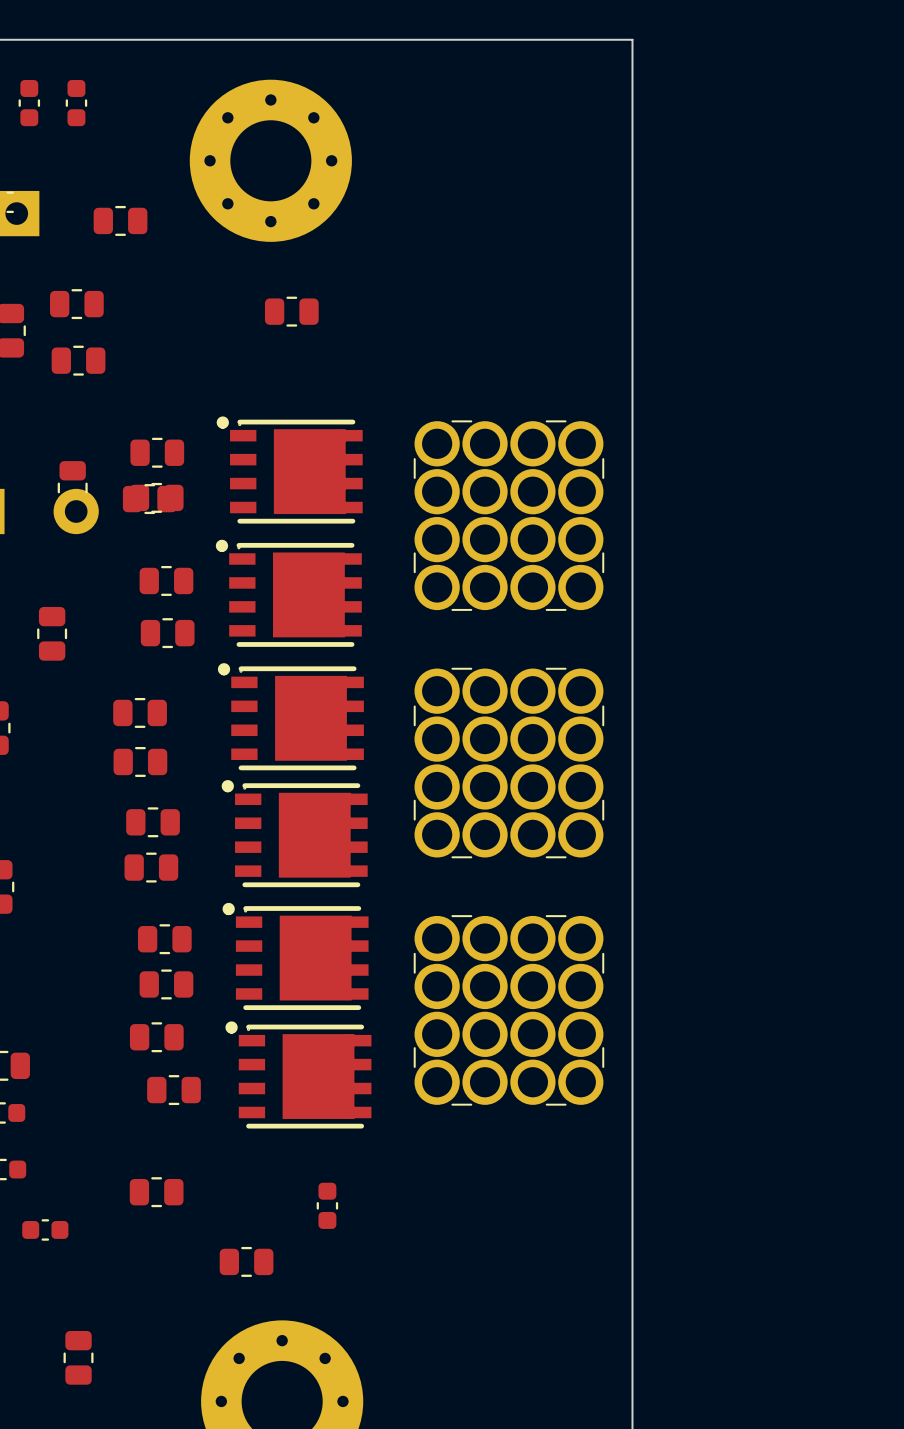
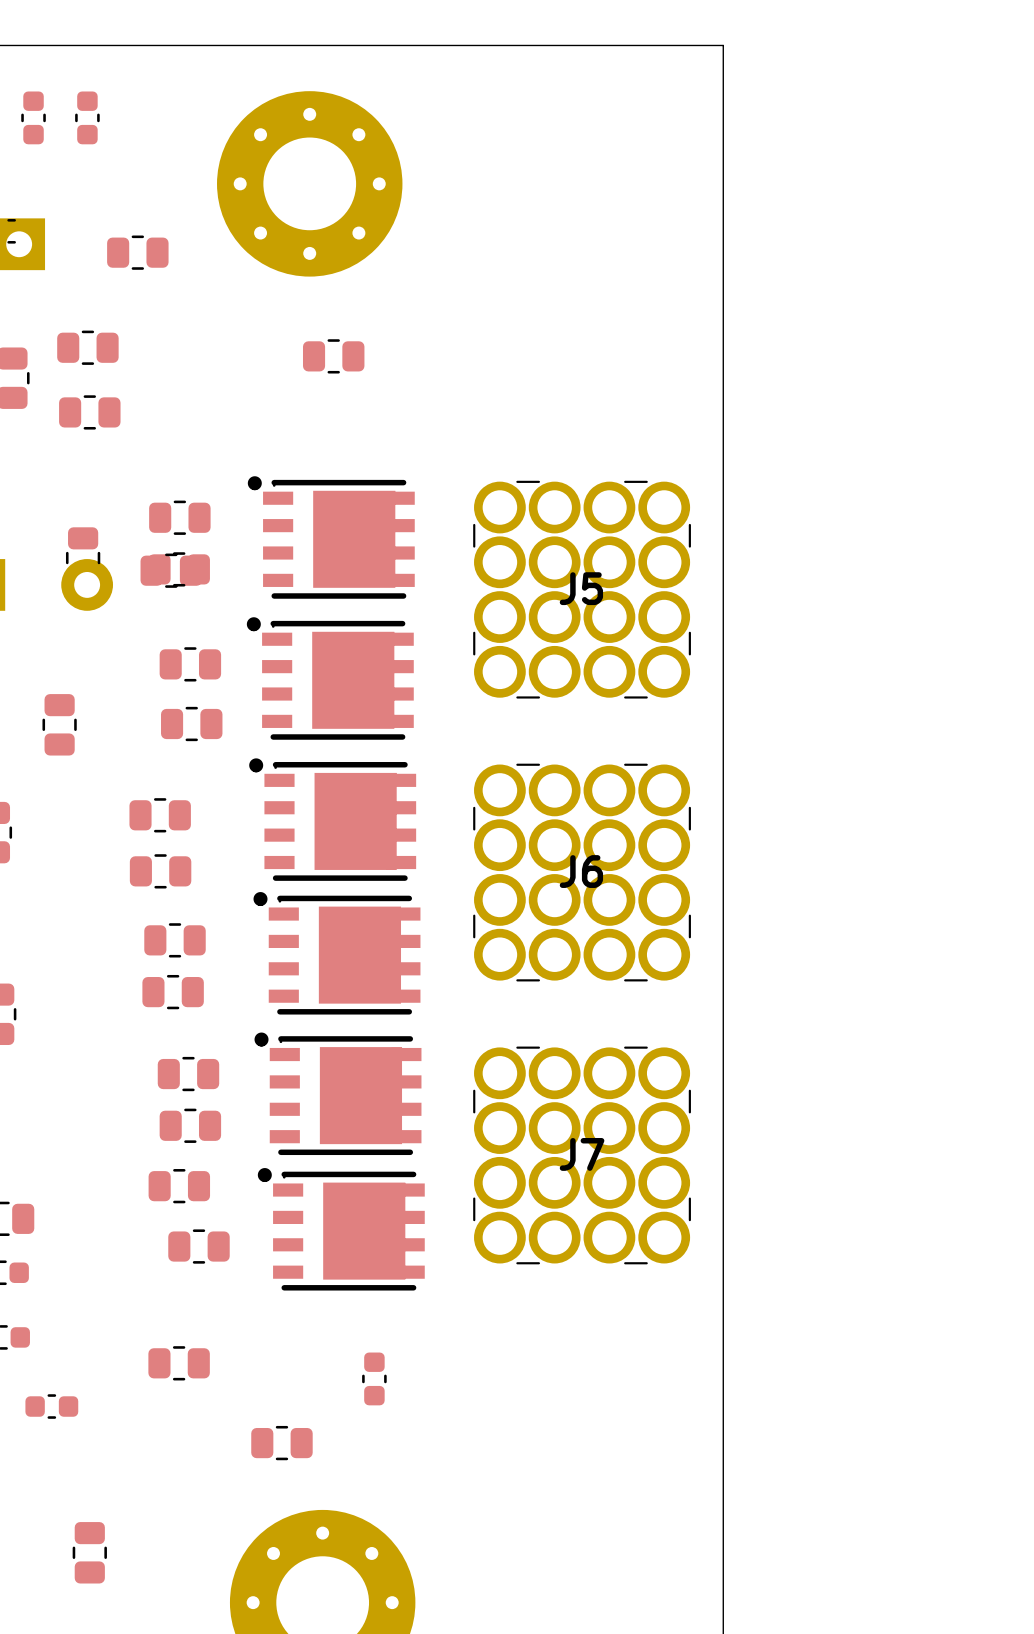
J5 name: none -> J5 (581, 588)
J6 name: none -> J6 (581, 871)
J7 name: none -> J7 (582, 1154)

